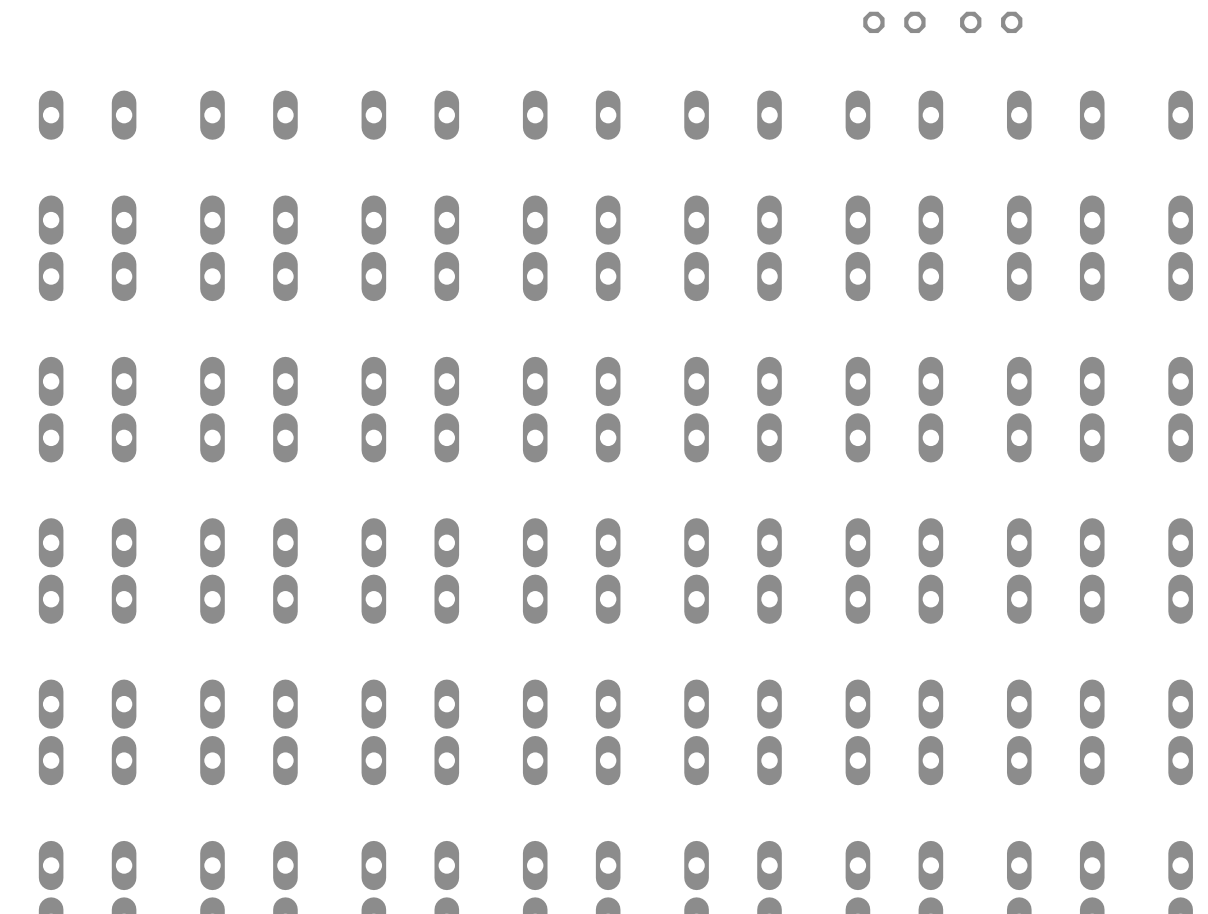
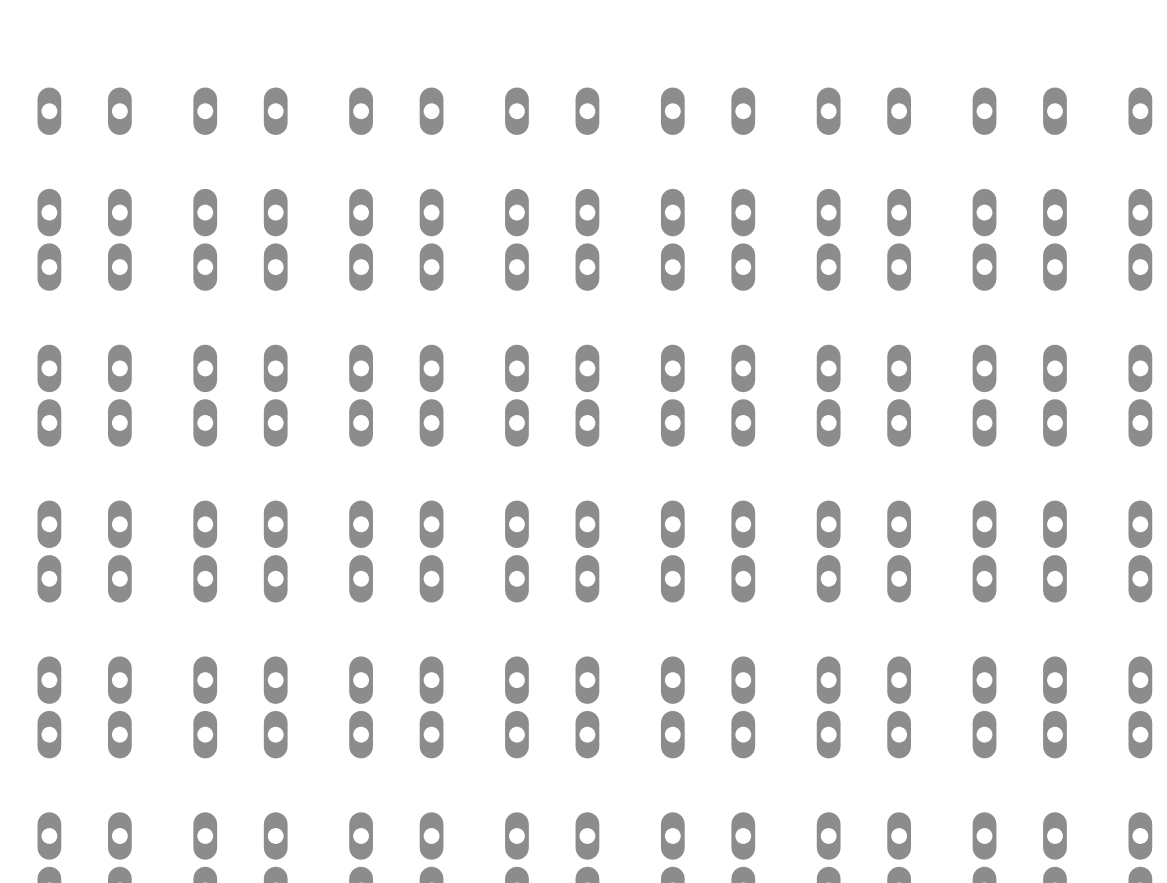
part: (894, 22) -> none
part: (991, 22) -> none

